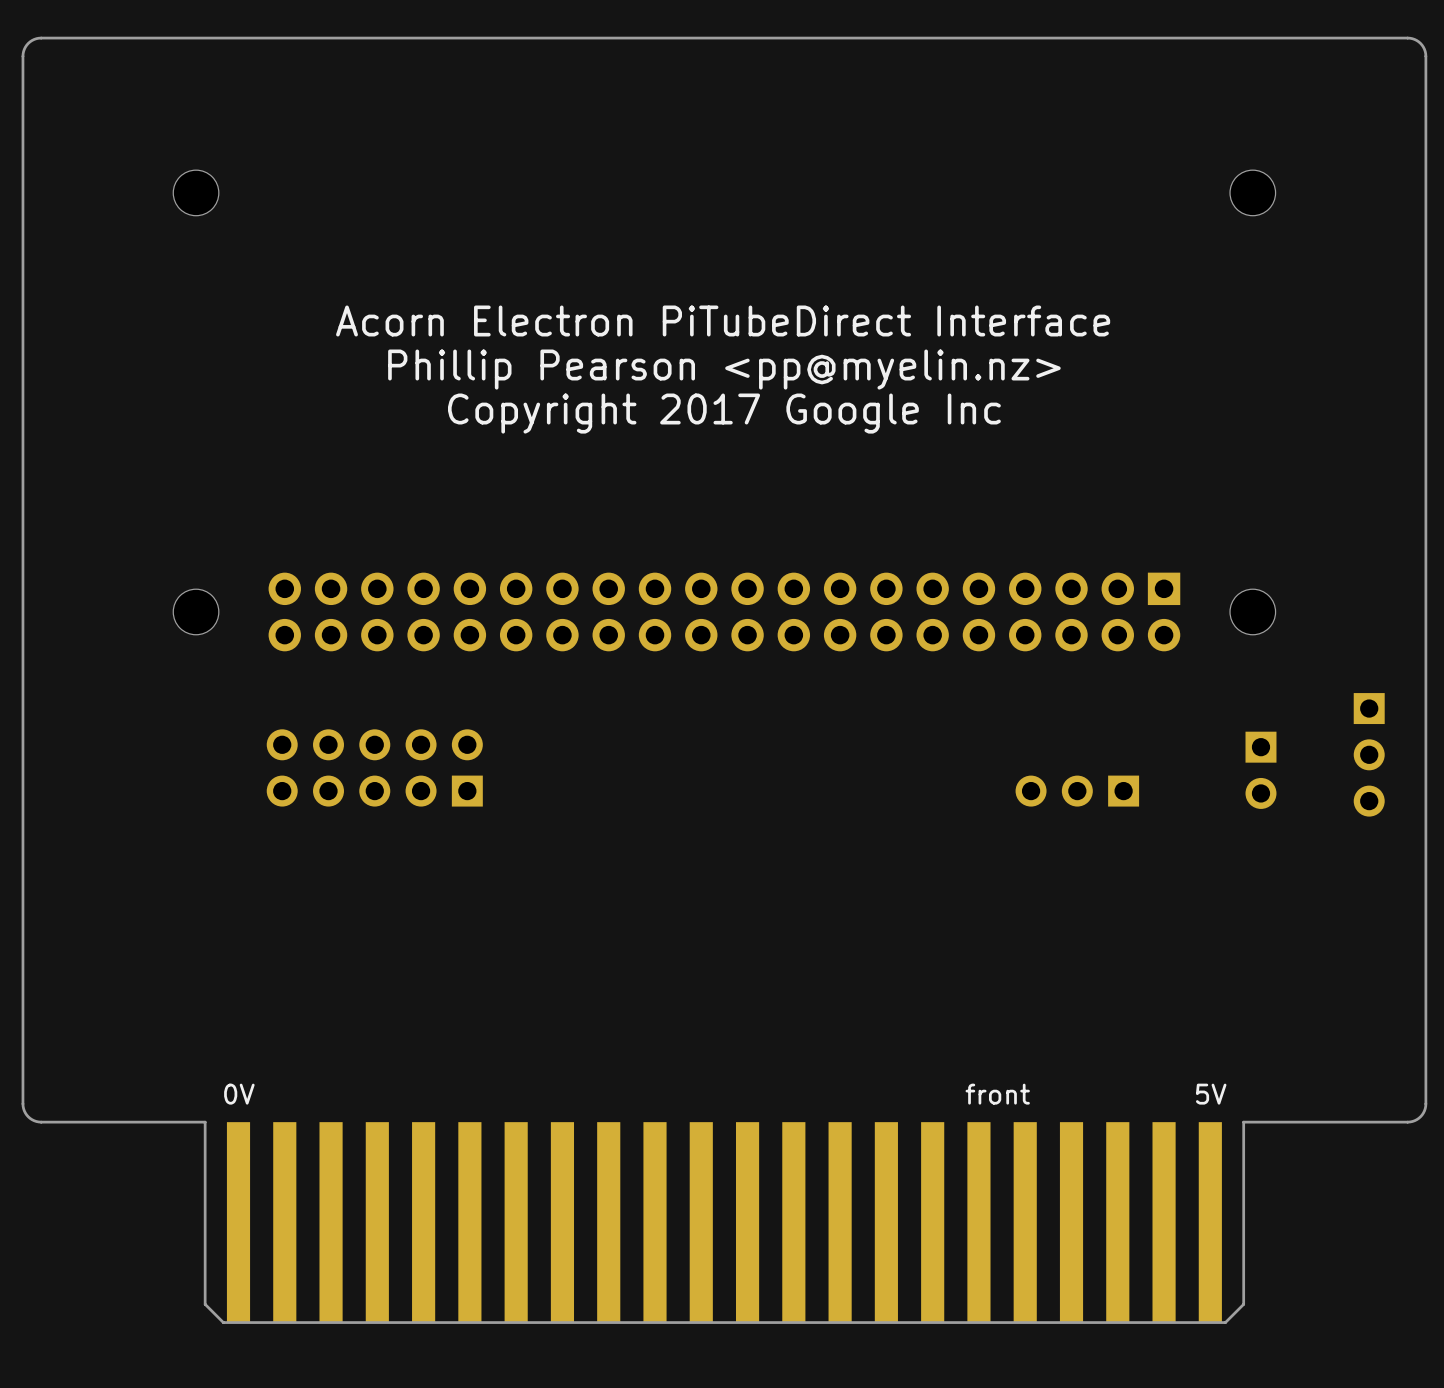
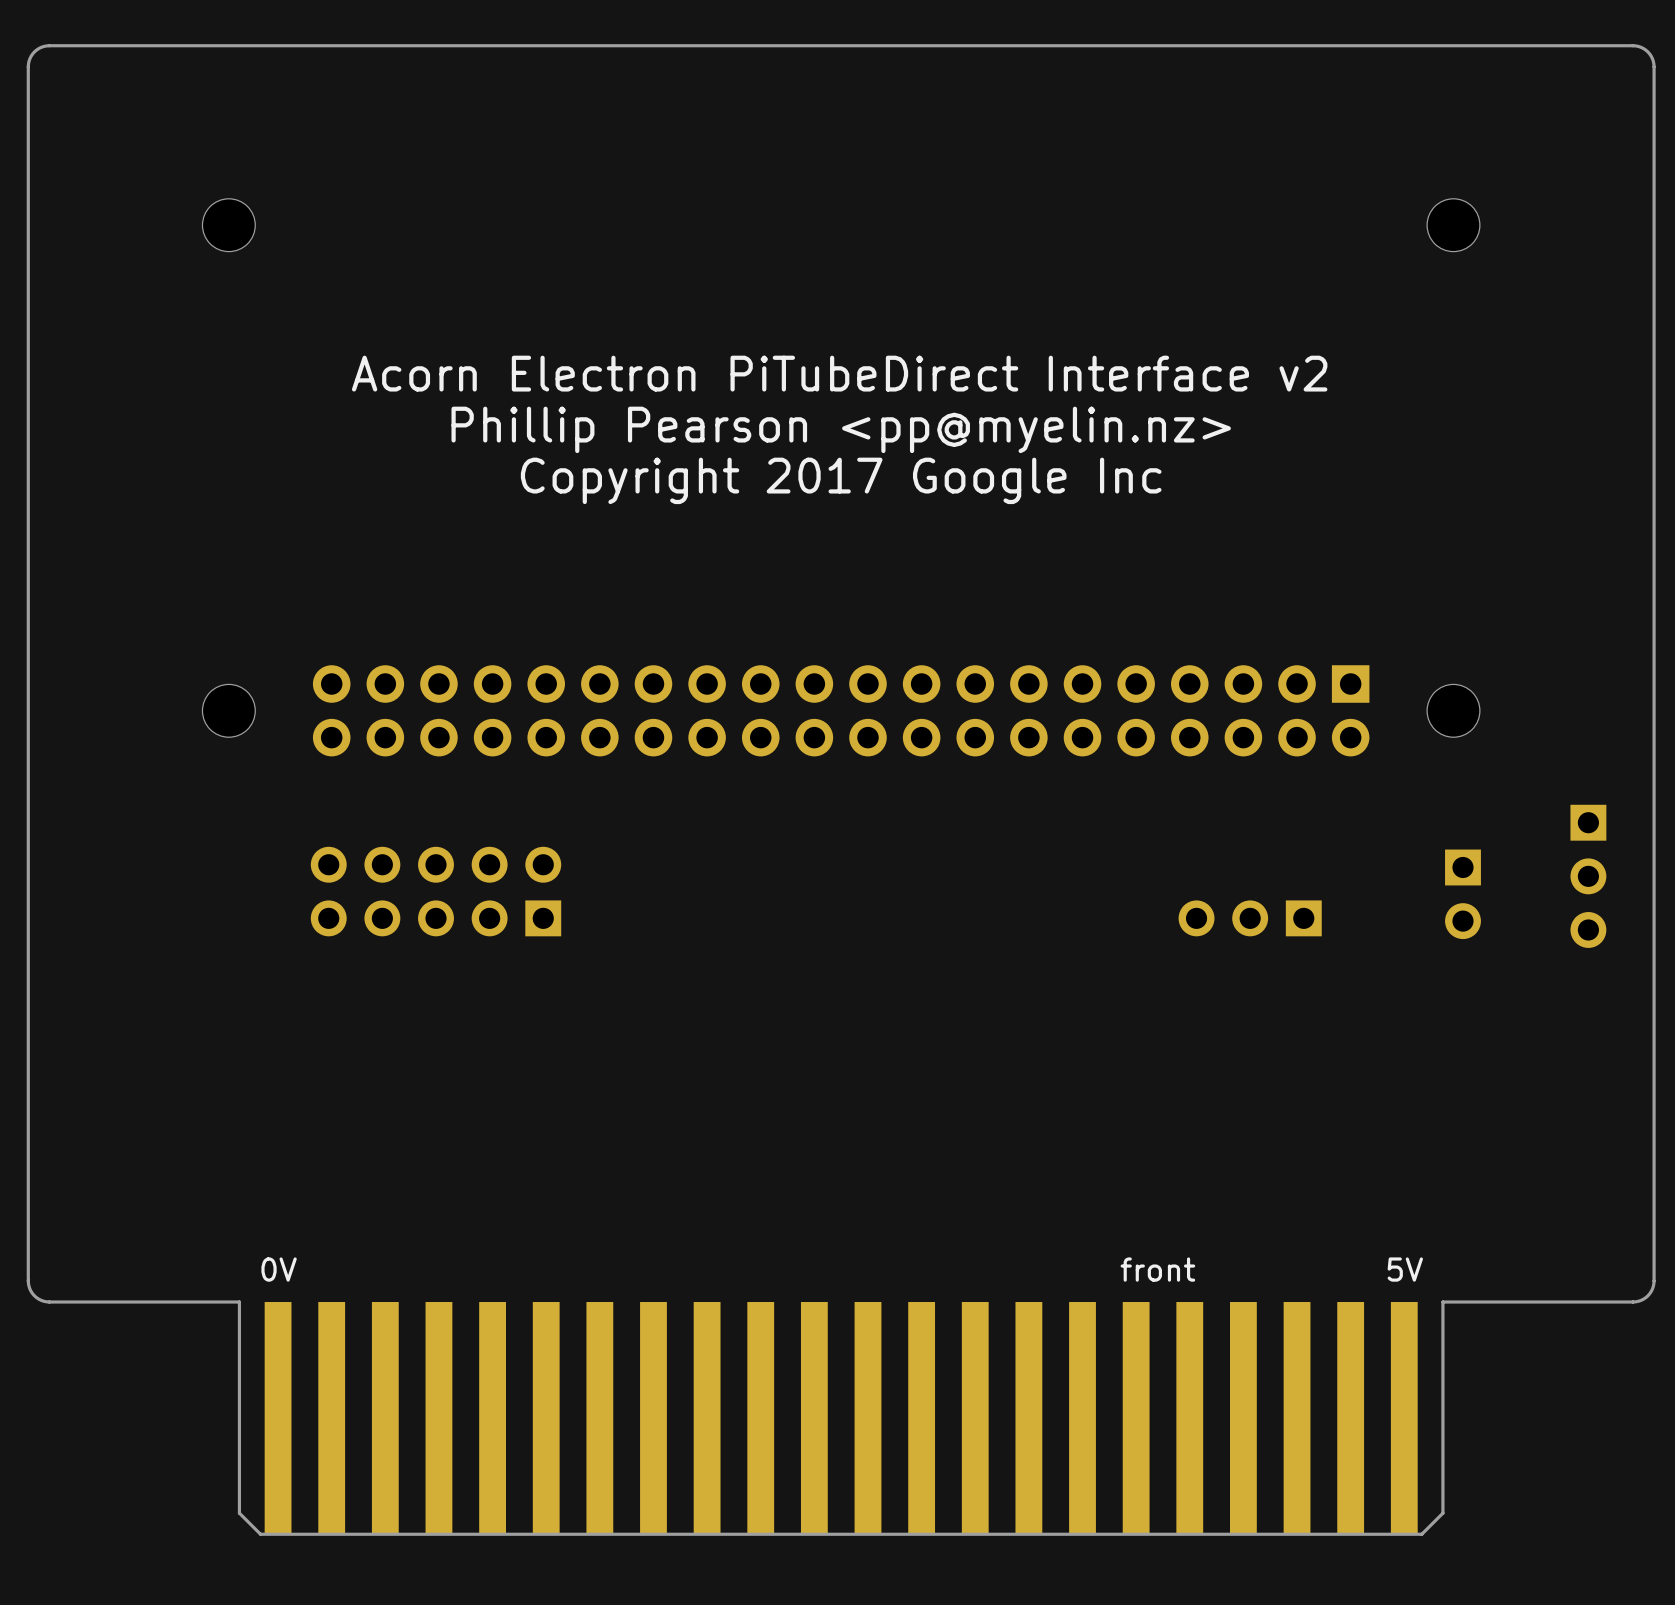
text: Acorn Electron PiTubeDirect Interface (723, 320) -> Acorn Electron PiTubeDirect Interface v2 (839, 373)

